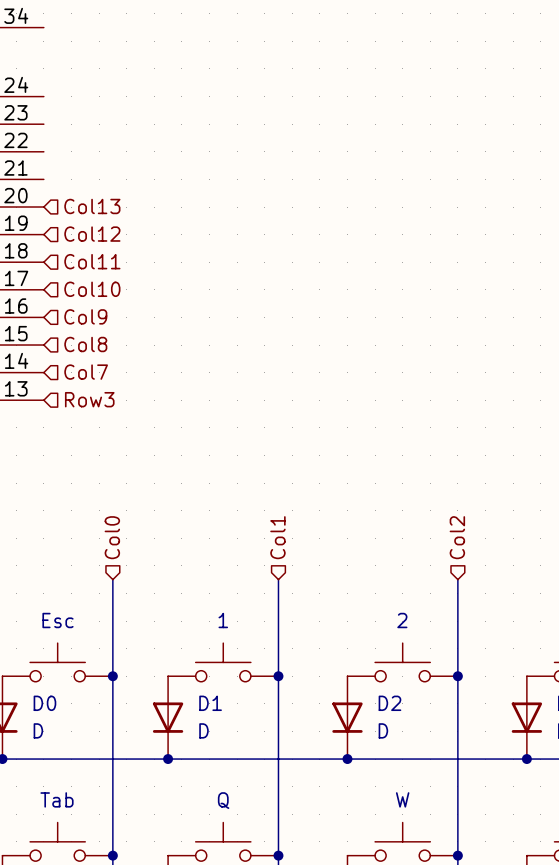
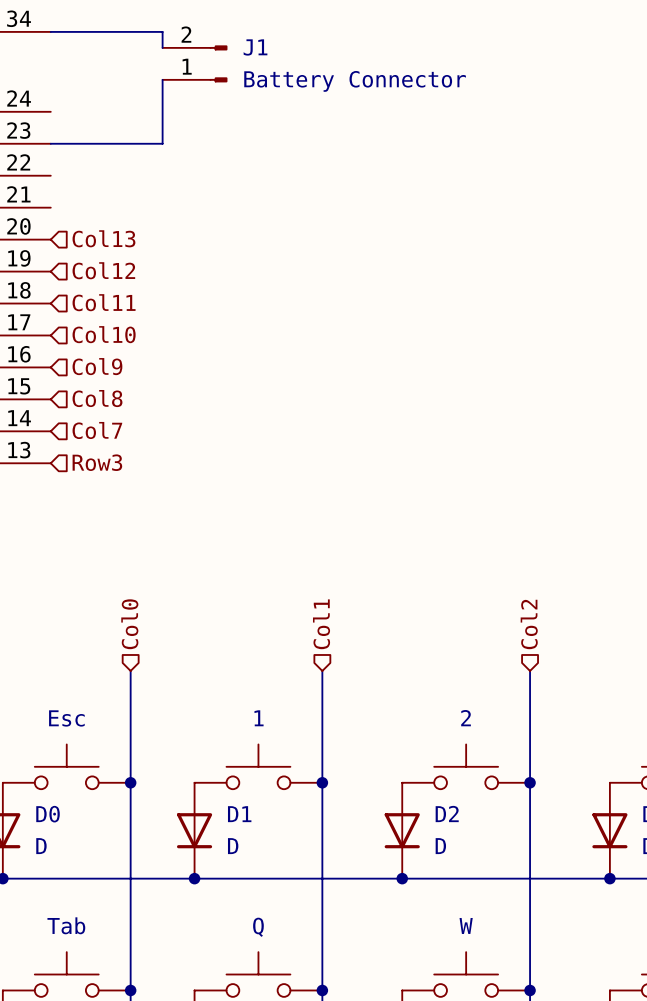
wire: none -> (50, 31) (162, 31) (162, 47)
J1: none -> Battery Connector (195, 63)
wire: none -> (162, 79) (162, 143) (50, 143)

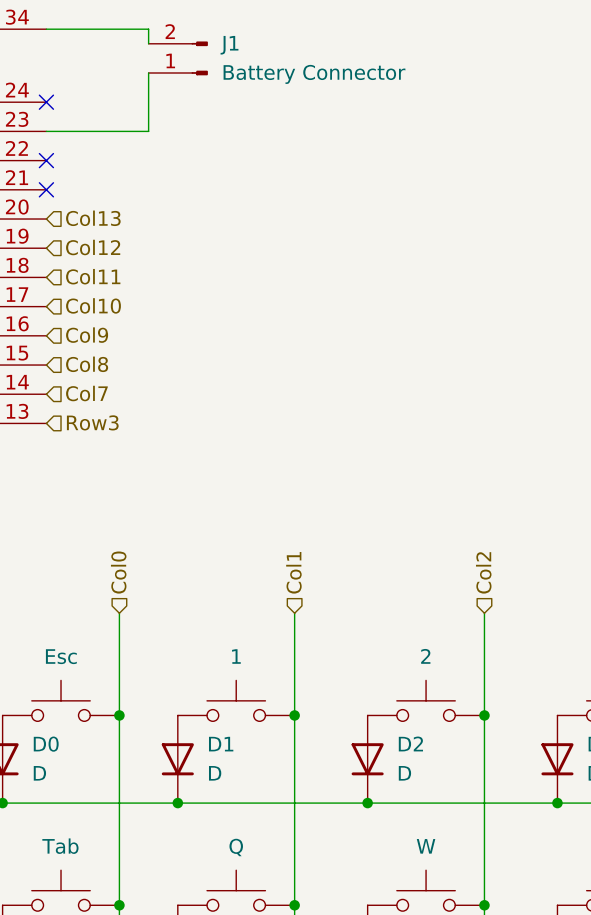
no-connect mark: none -> (46, 102)
no-connect mark: none -> (46, 160)
no-connect mark: none -> (46, 189)

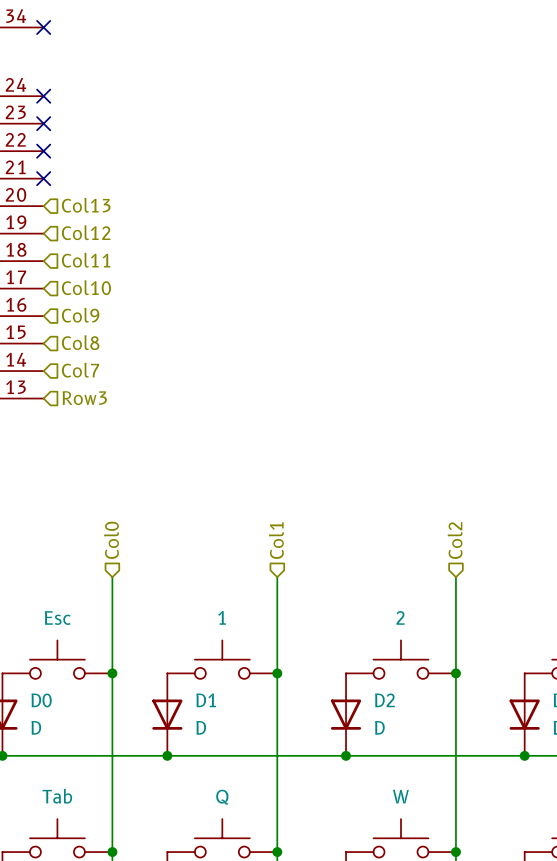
wire: (46, 29) (148, 29) (148, 43) -> none
no-connect mark: none -> (43, 27)
J1: Battery Connector (178, 58) -> none
wire: (148, 72) (148, 131) (46, 131) -> none
no-connect mark: none -> (43, 123)

